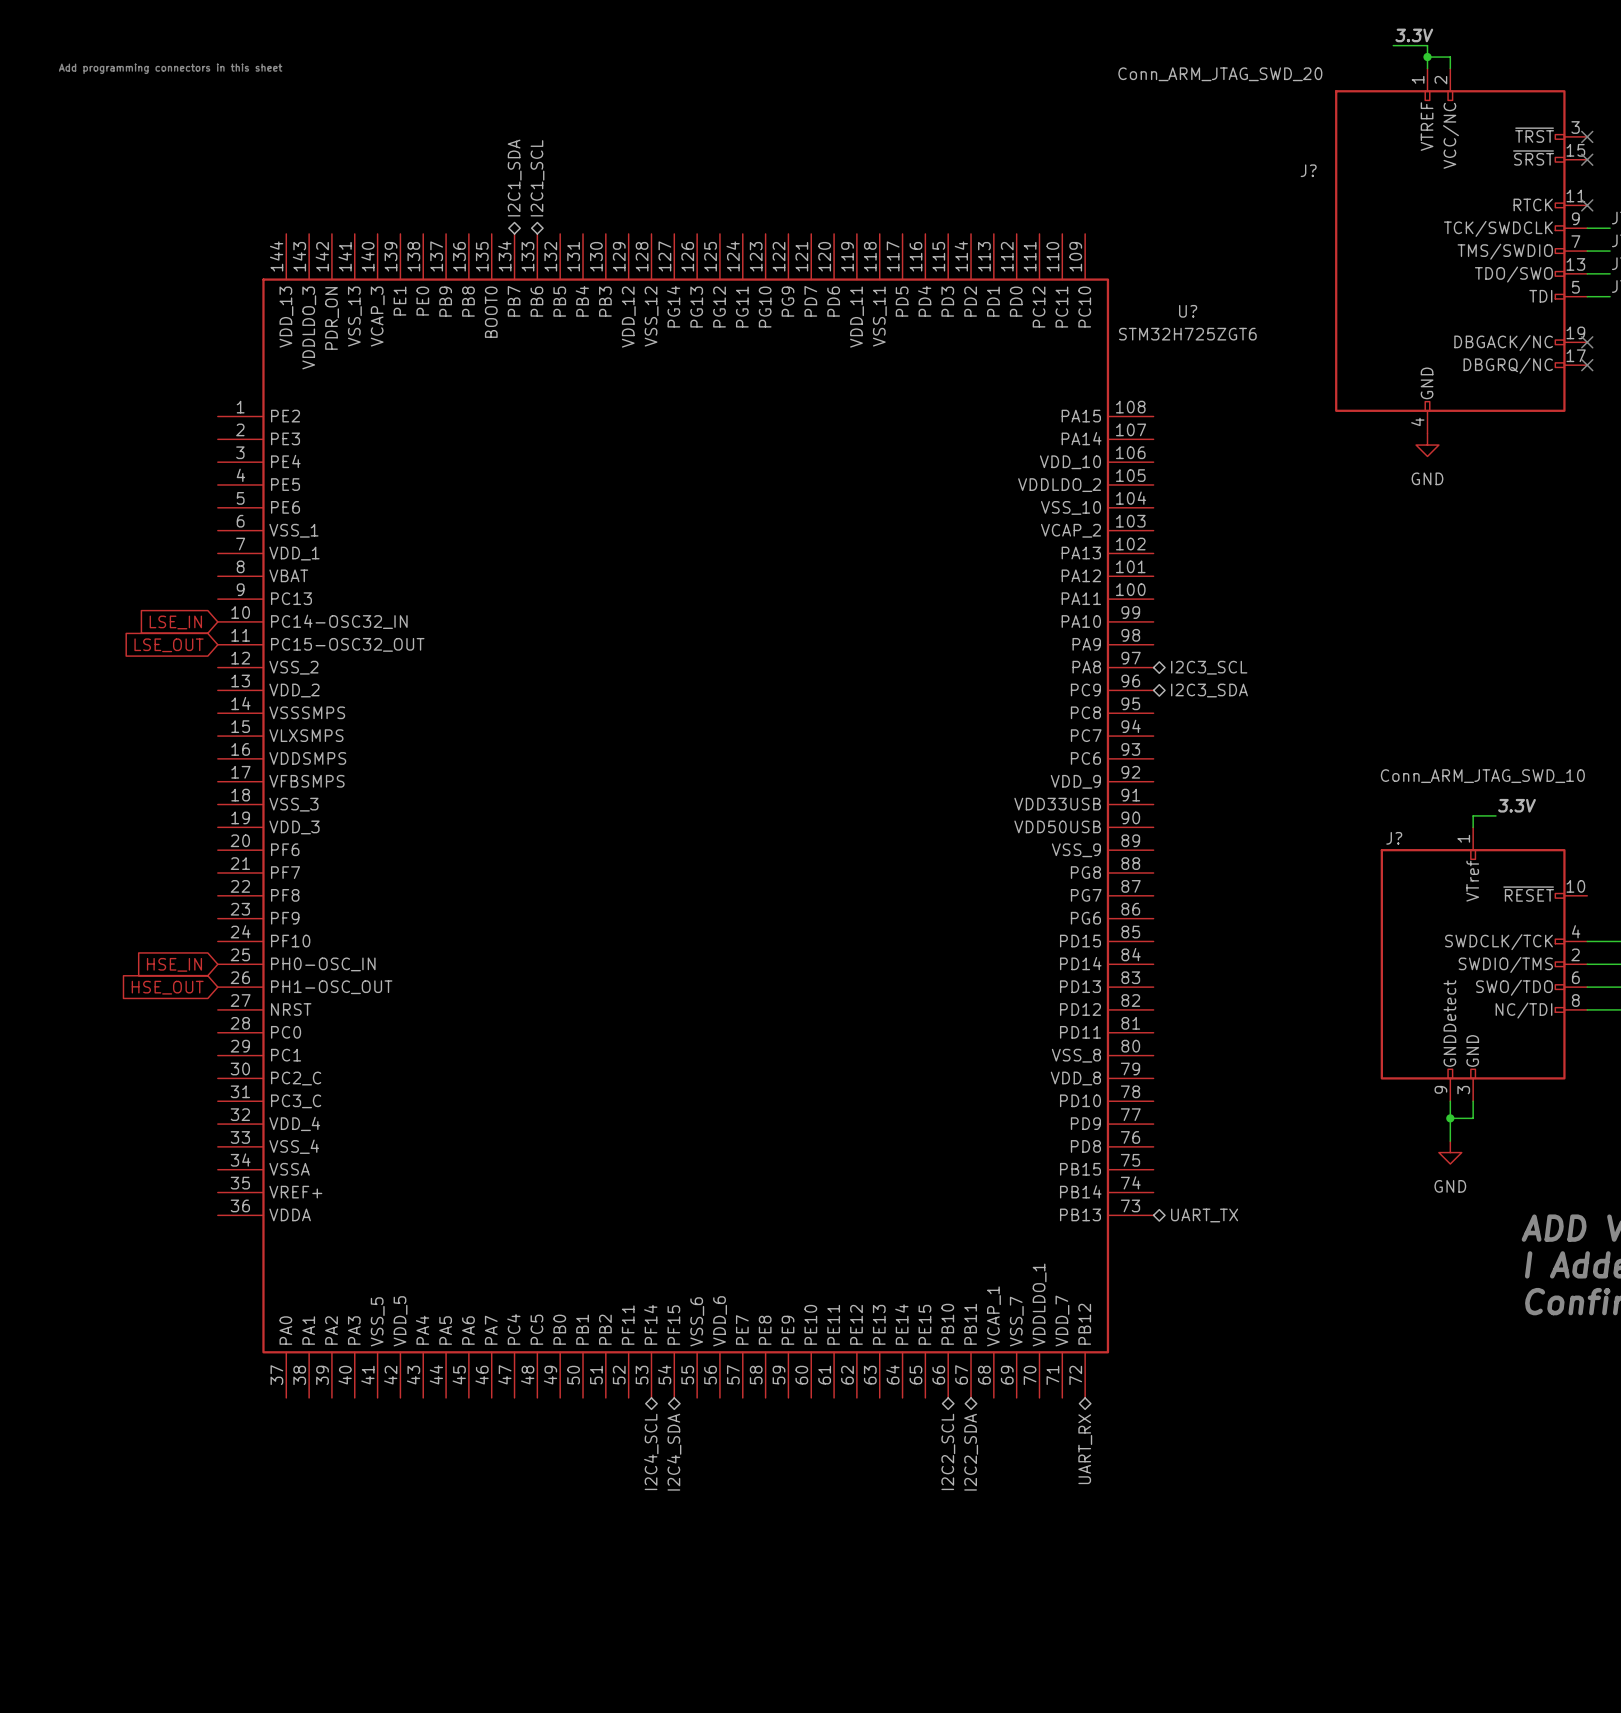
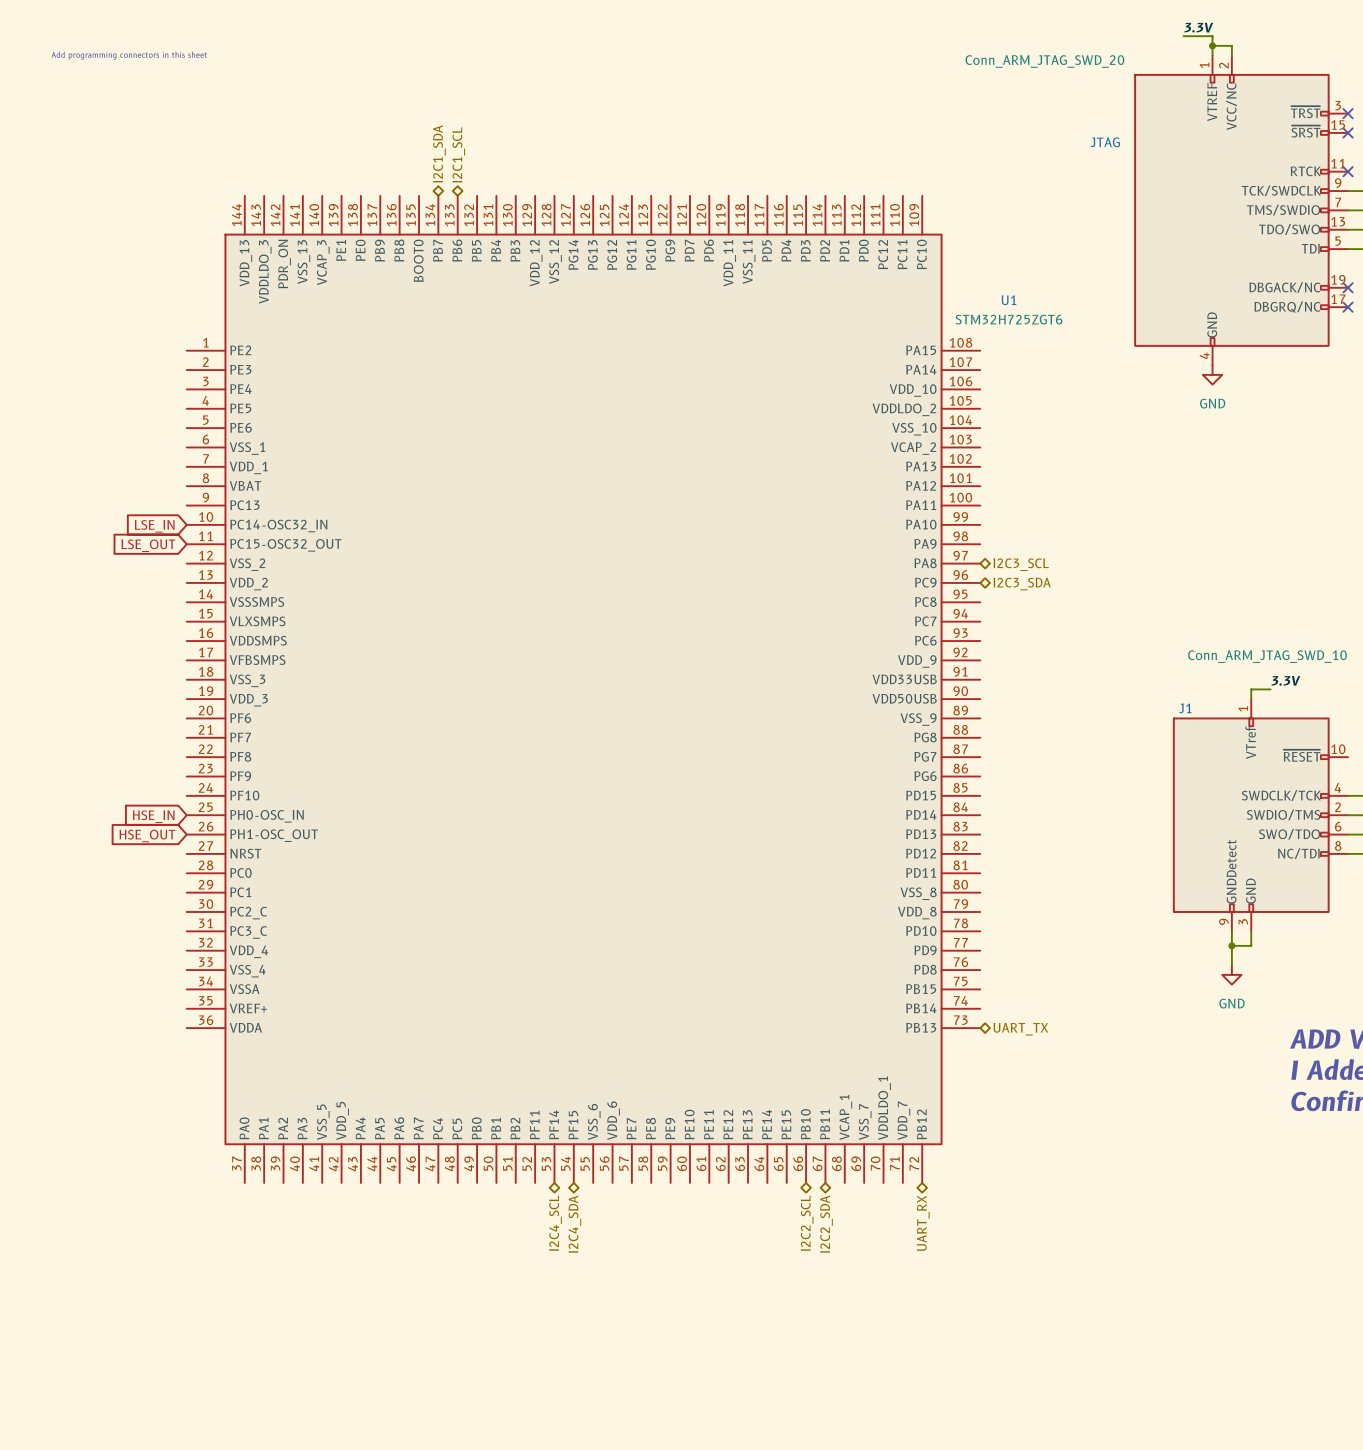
J? name: J? (1308, 170) -> JTAG (1105, 142)
U? name: U? (1188, 311) -> U1 (1008, 300)
U? value position: STM32H725ZGT6 (1187, 334) -> STM32H725ZGT6 (1009, 319)
J? name: J? (1394, 838) -> J1 (1185, 708)

